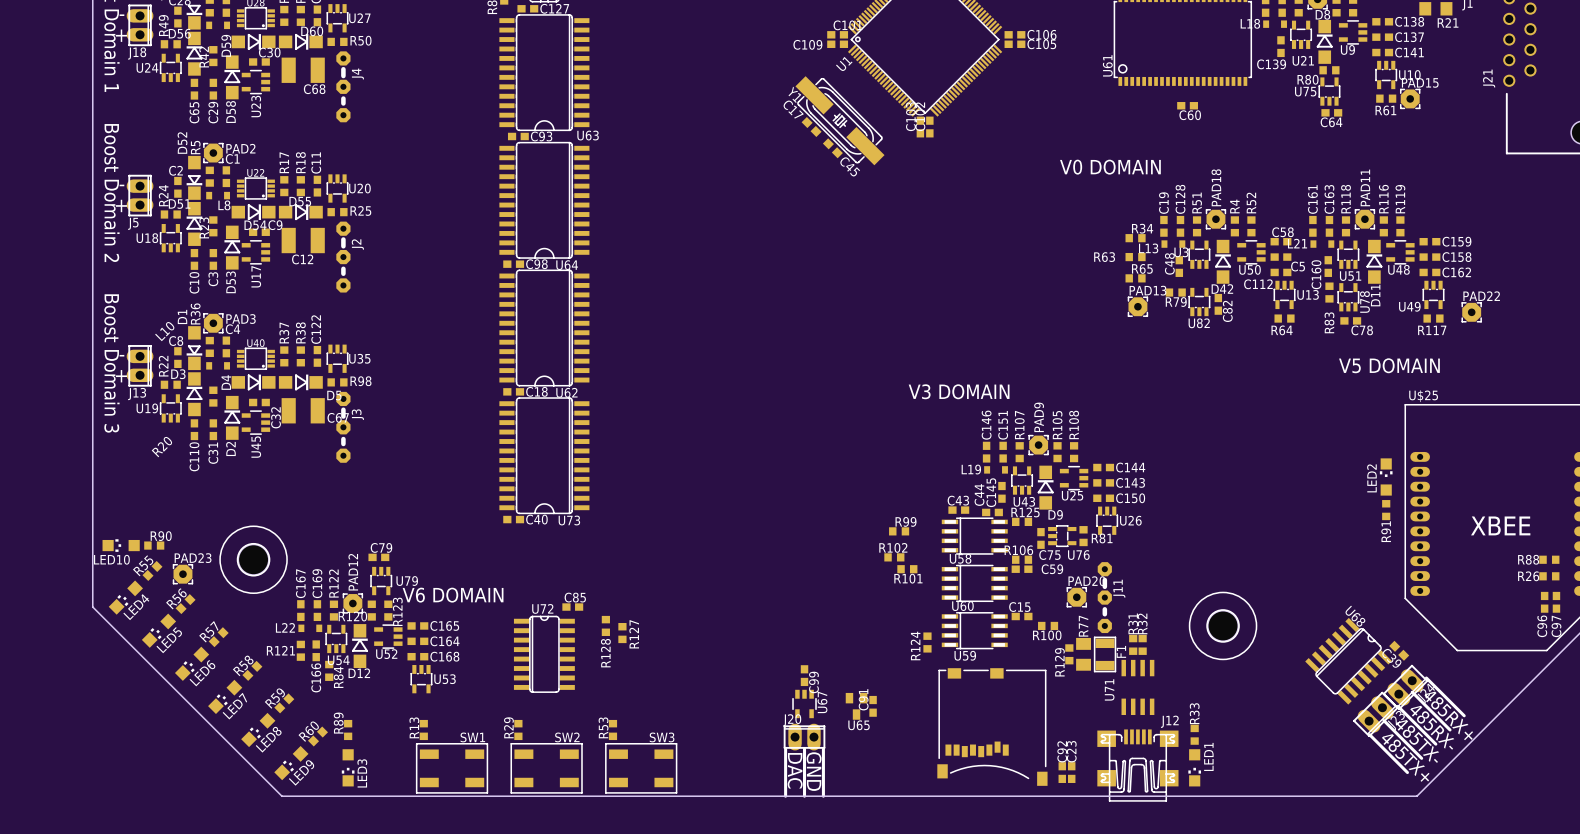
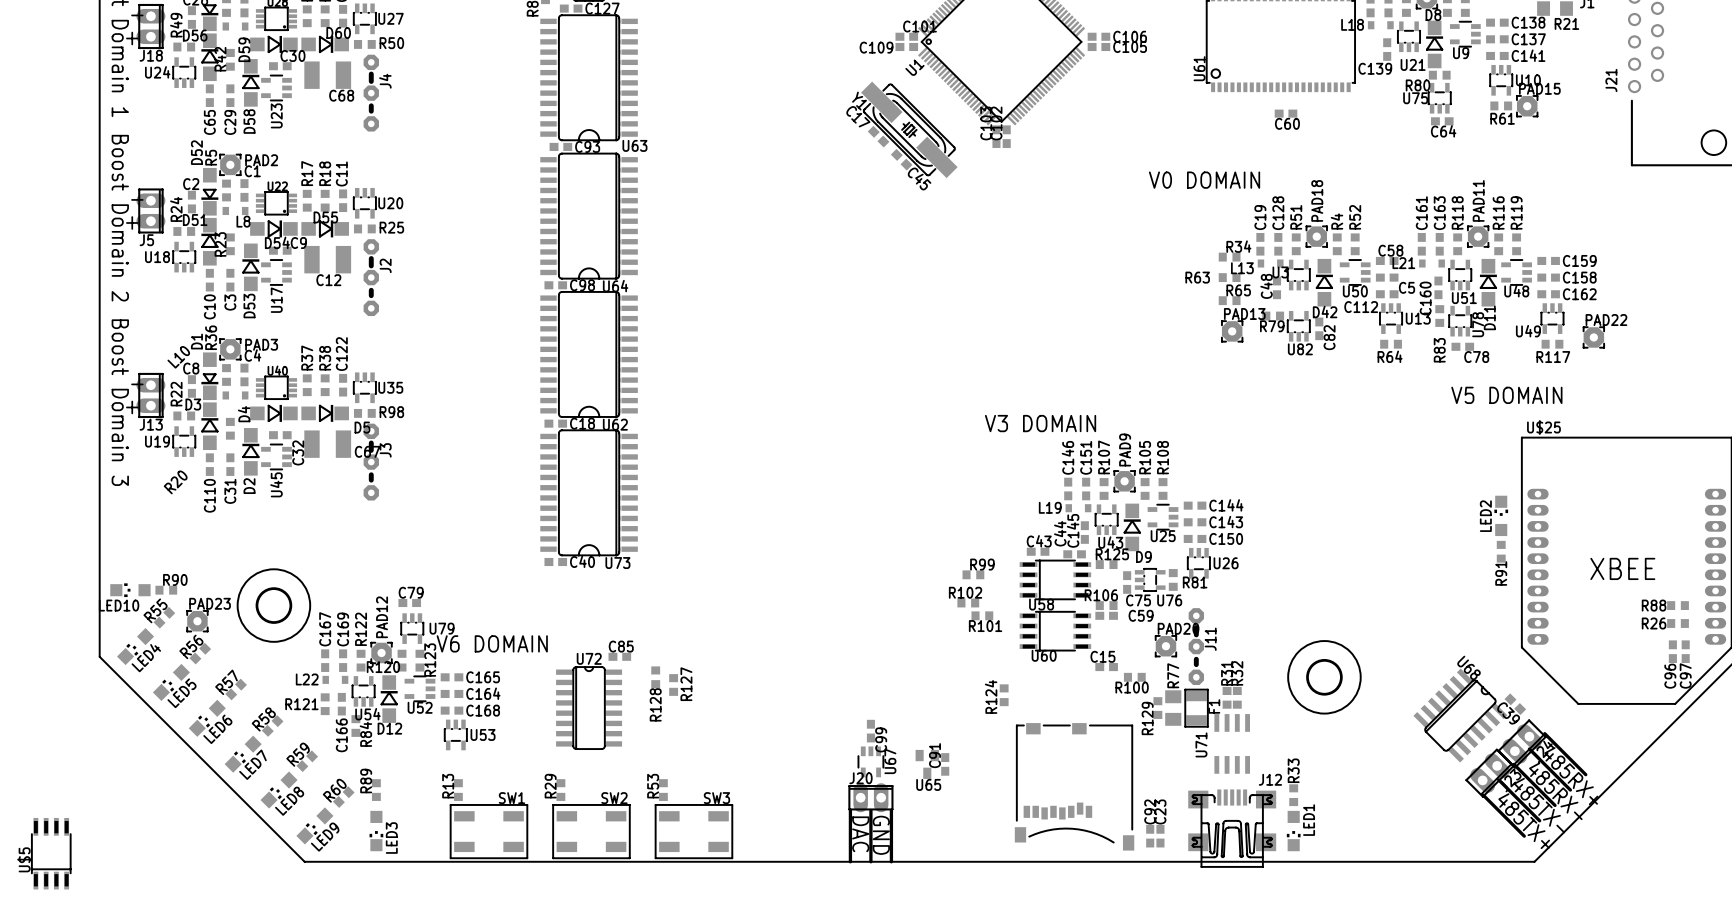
U59: (974, 630) -> none
U$5: none -> (51, 853)

